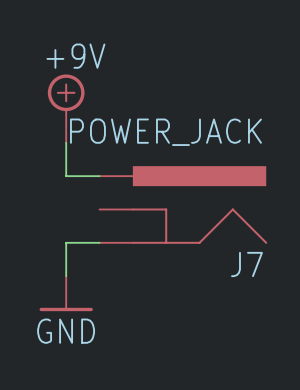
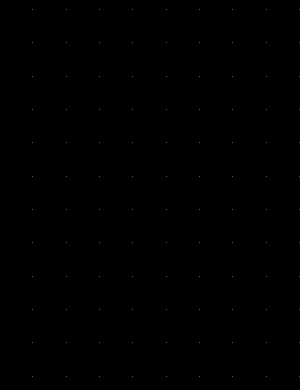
power symbol: +9V (66, 108) -> none
wire: (66, 142) (66, 176) (99, 176) -> none
J7: POWER_JACK (183, 204) -> none
wire: (99, 242) (66, 242) (66, 276) -> none
power symbol: GND (66, 293) -> none

